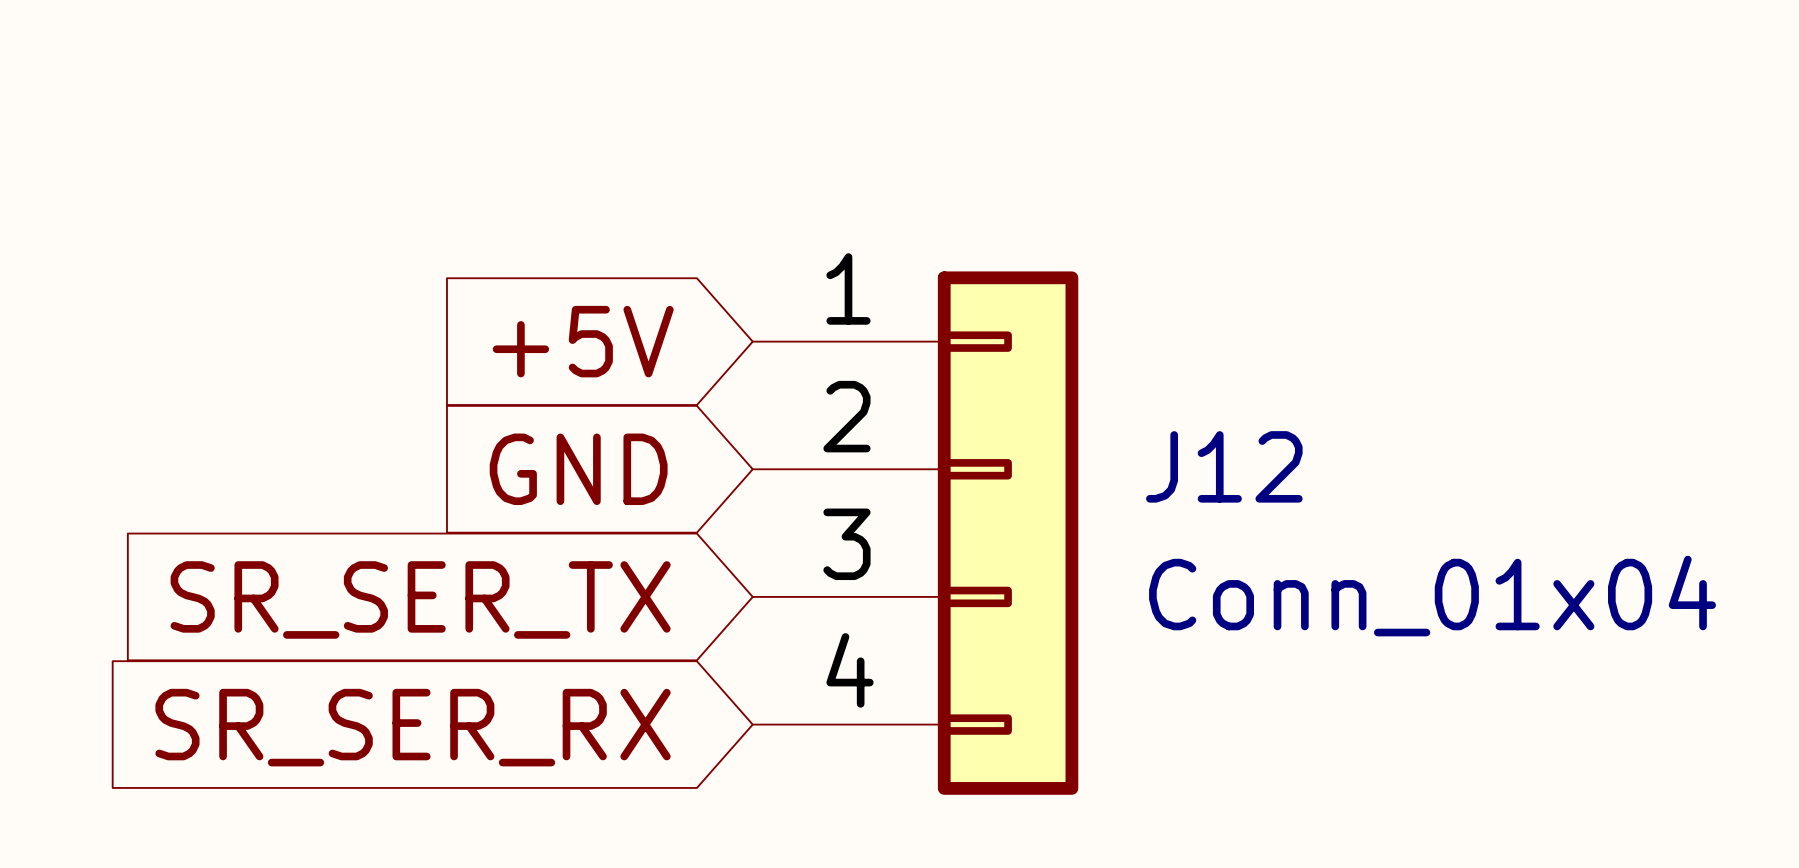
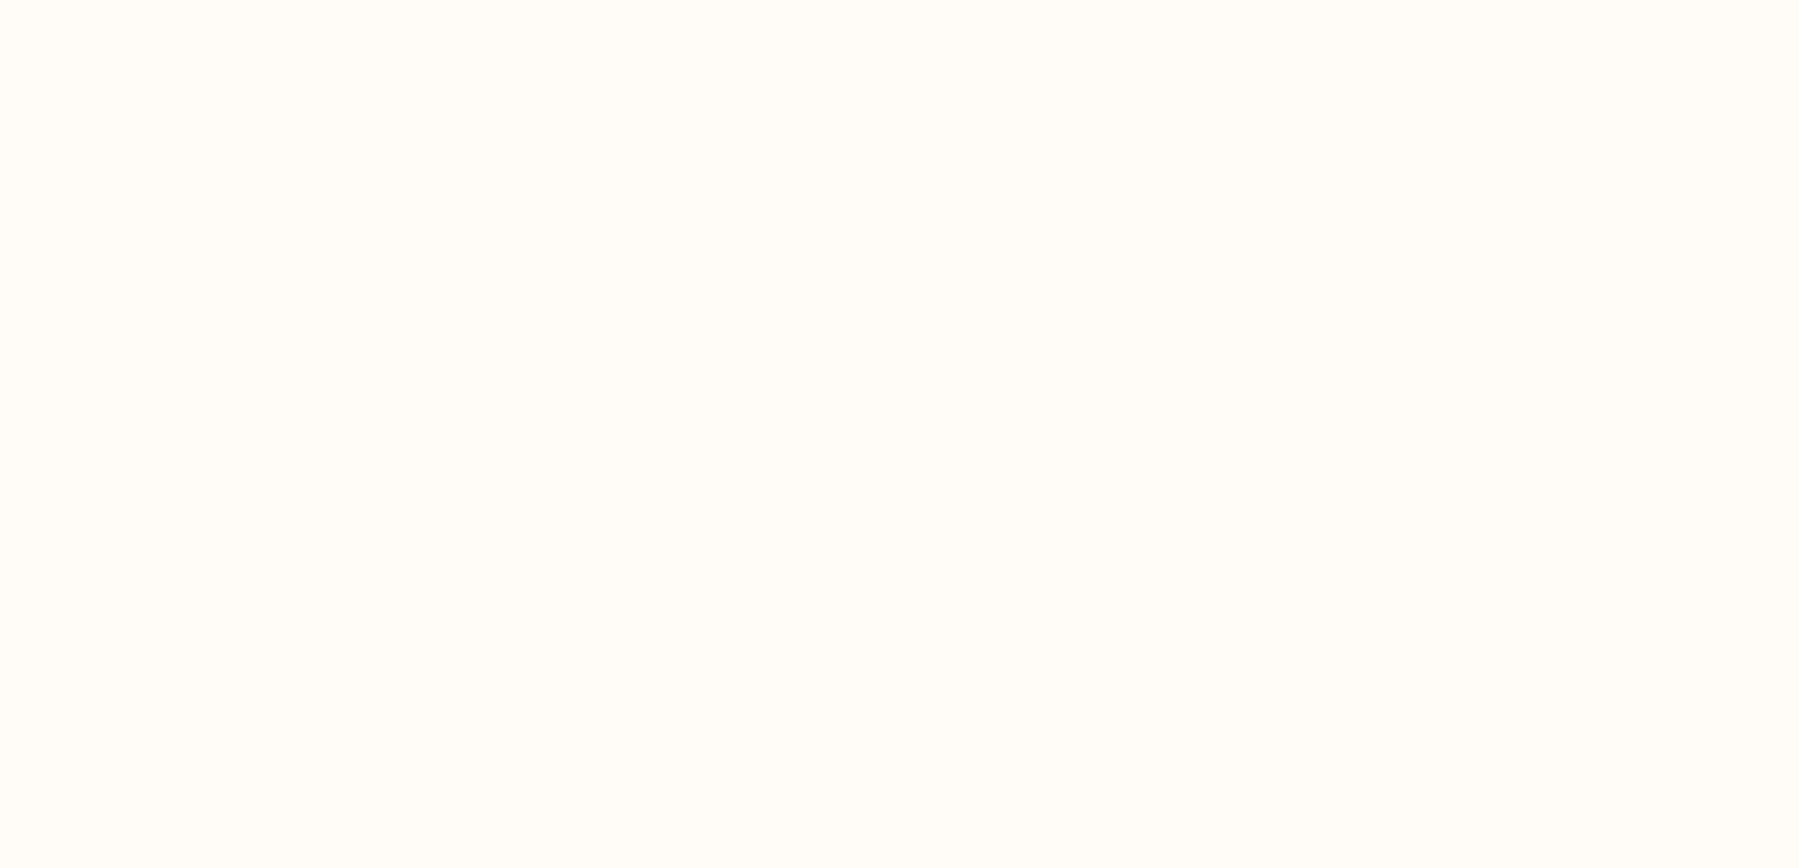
global label: +5V (583, 341) -> none
global label: GND (578, 469) -> none
J12: Conn_01x04 (915, 533) -> none
global label: SR_SER_TX (420, 599) -> none
global label: SR_SER_RX (413, 727) -> none

